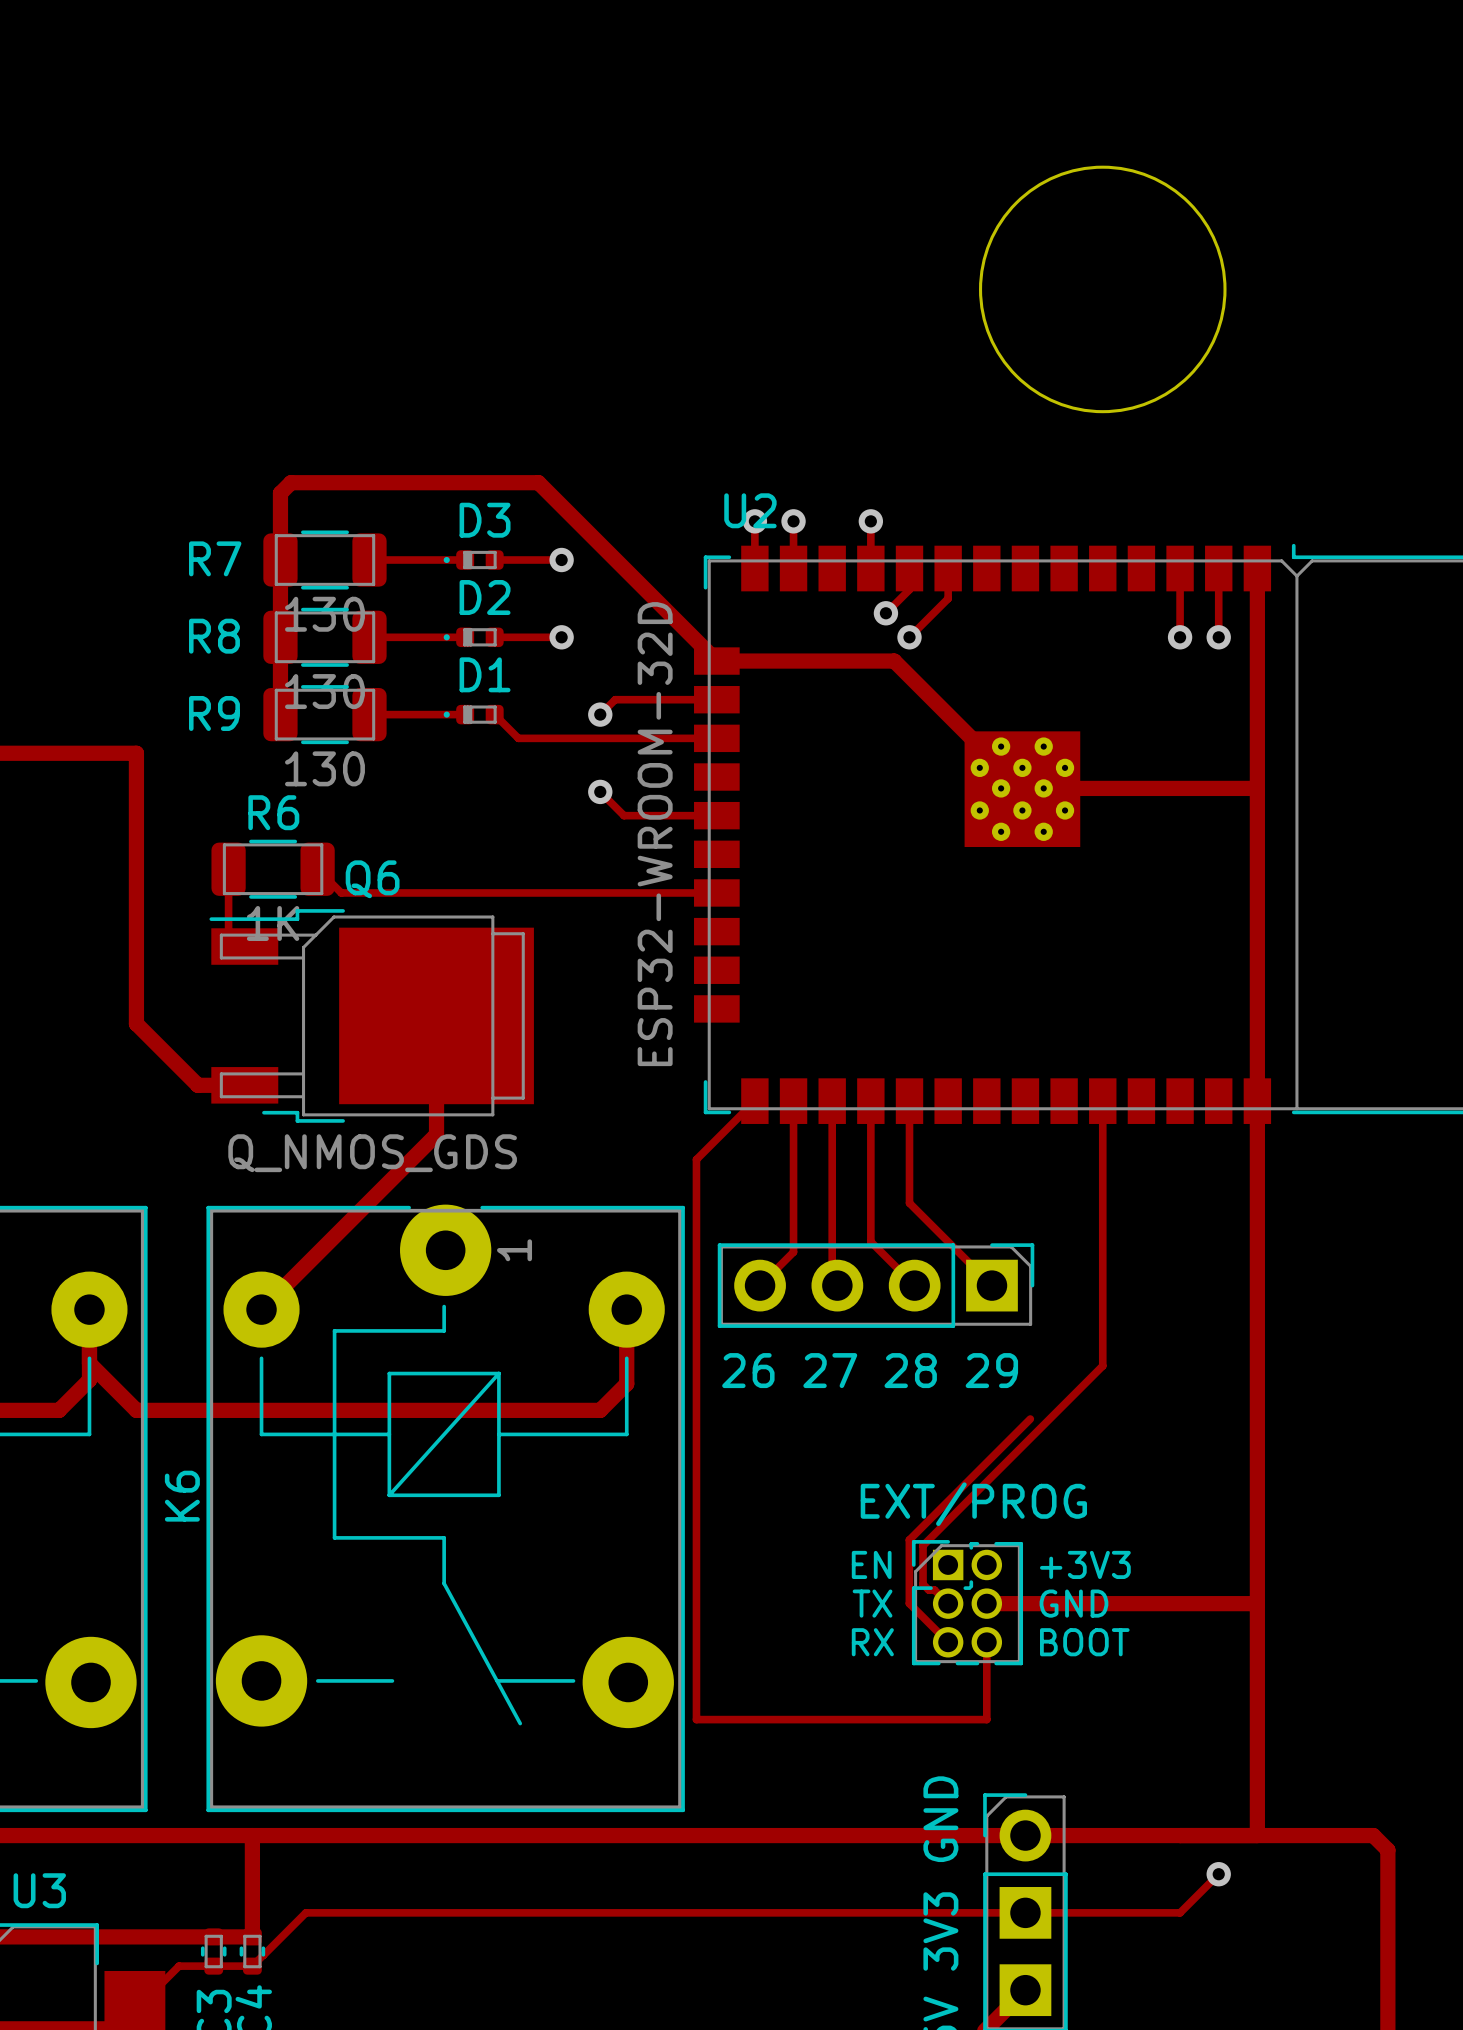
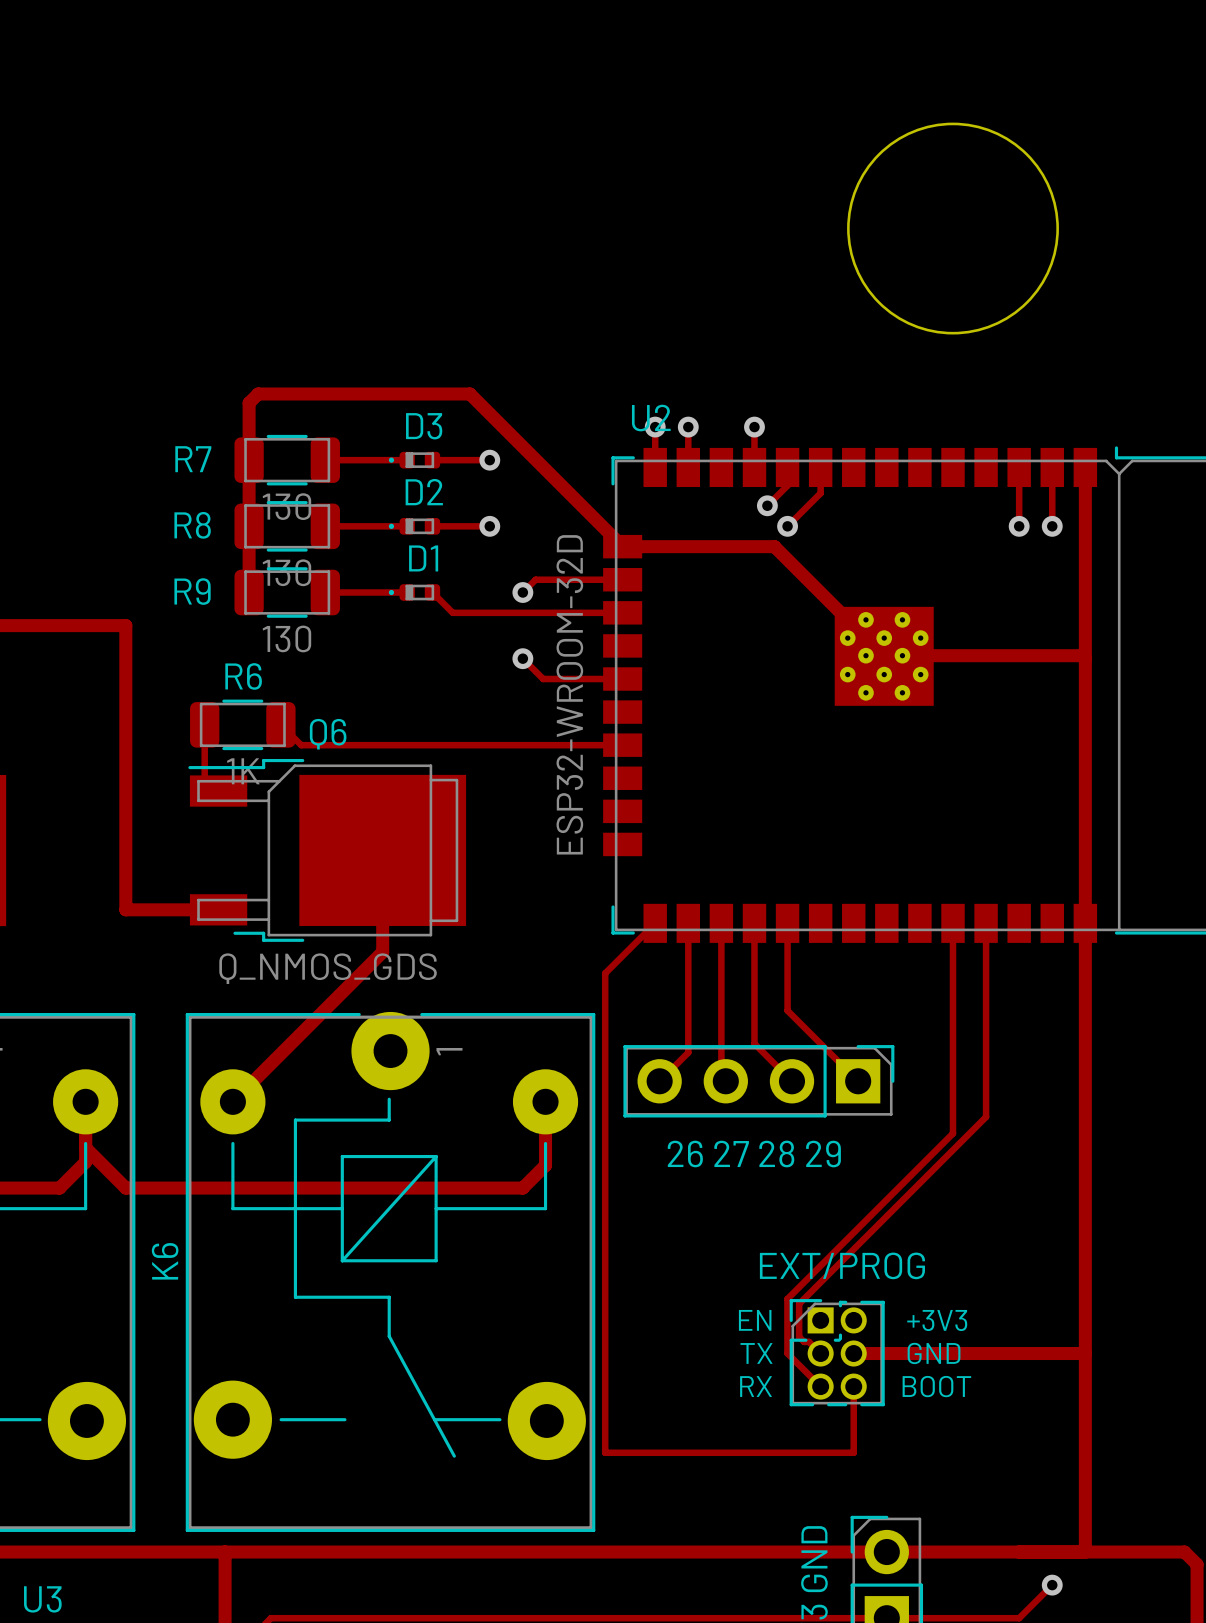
track: (136, 1023) (197, 1085) -> (125, 857) (125, 909) (178, 909)
track: none -> (986, 923) (986, 1116) (953, 1150)
track: (1102, 1346) (1102, 1365) -> (953, 1133) (891, 1195)

